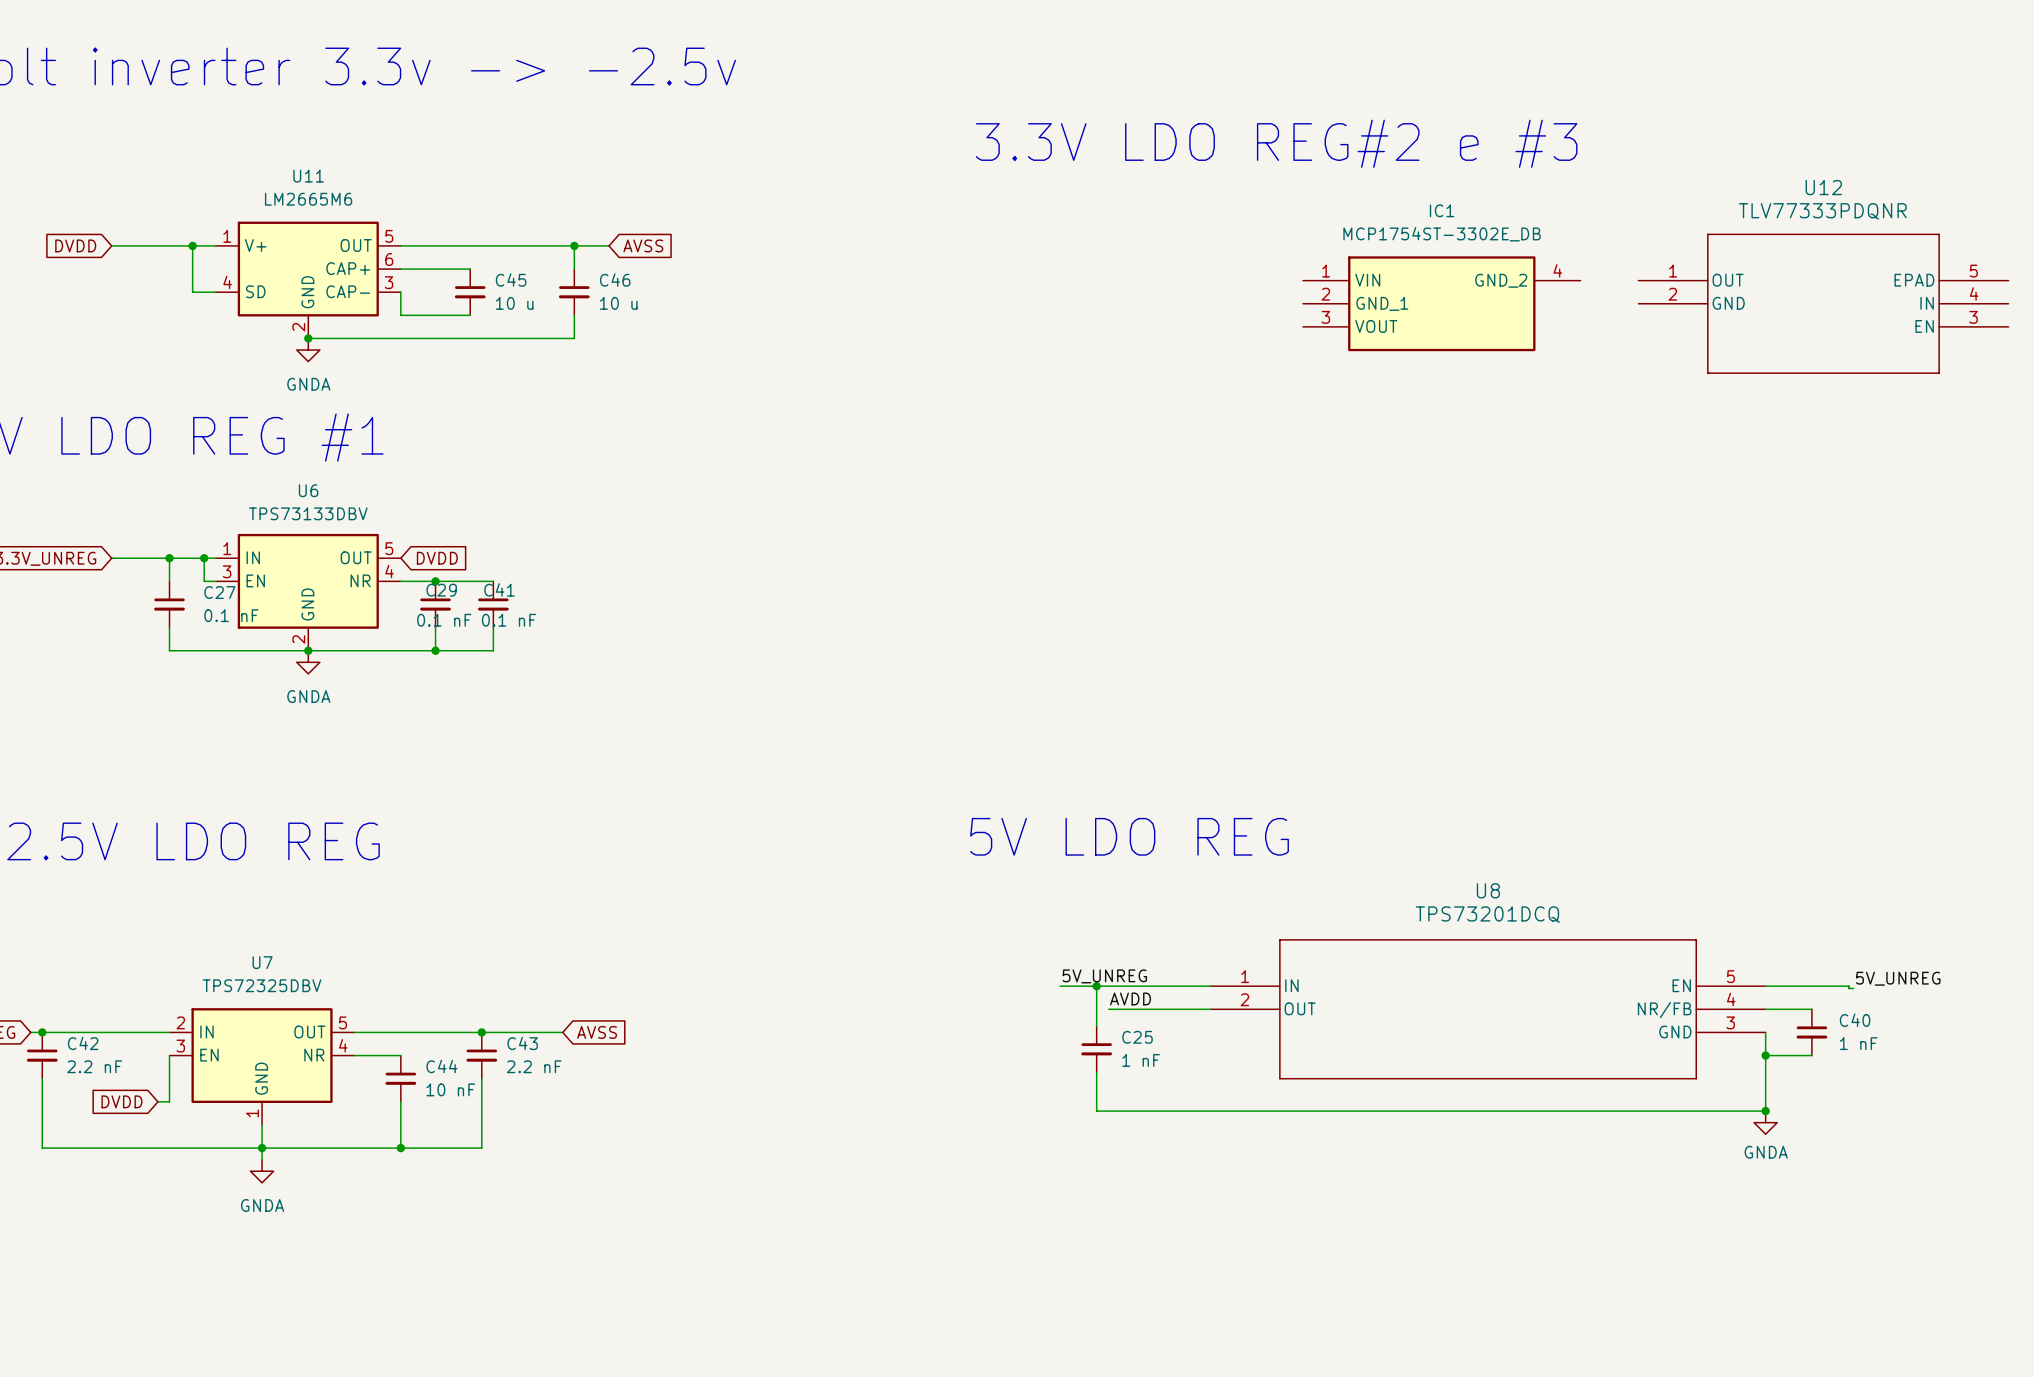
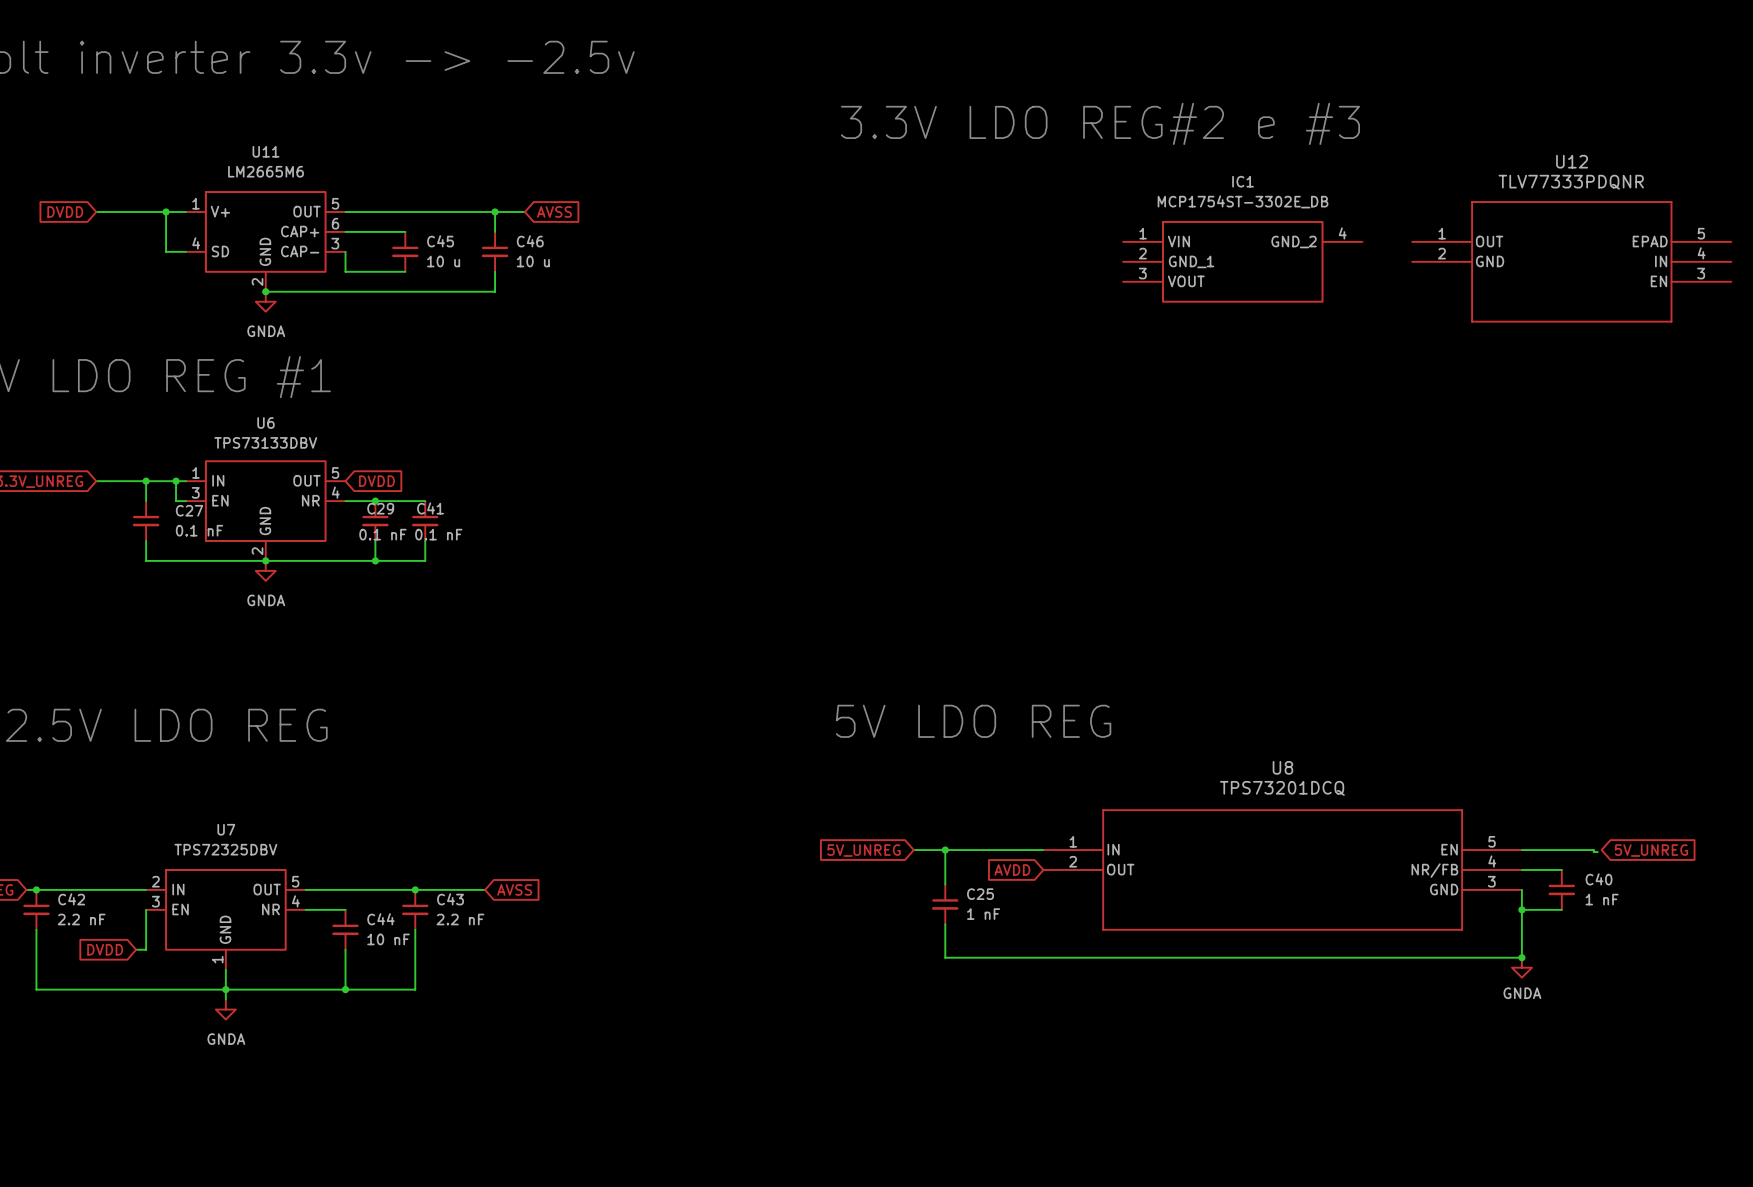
label: 5V_UNREG (1104, 976) -> none
label: 5V_UNREG (1898, 978) -> none
global label: none -> 5V_UNREG (864, 850)
global label: none -> 5V_UNREG (1651, 850)
label: AVDD (1130, 998) -> none
wire: (1108, 1009) (1210, 1009) -> none
global label: none -> AVDD (1012, 869)

